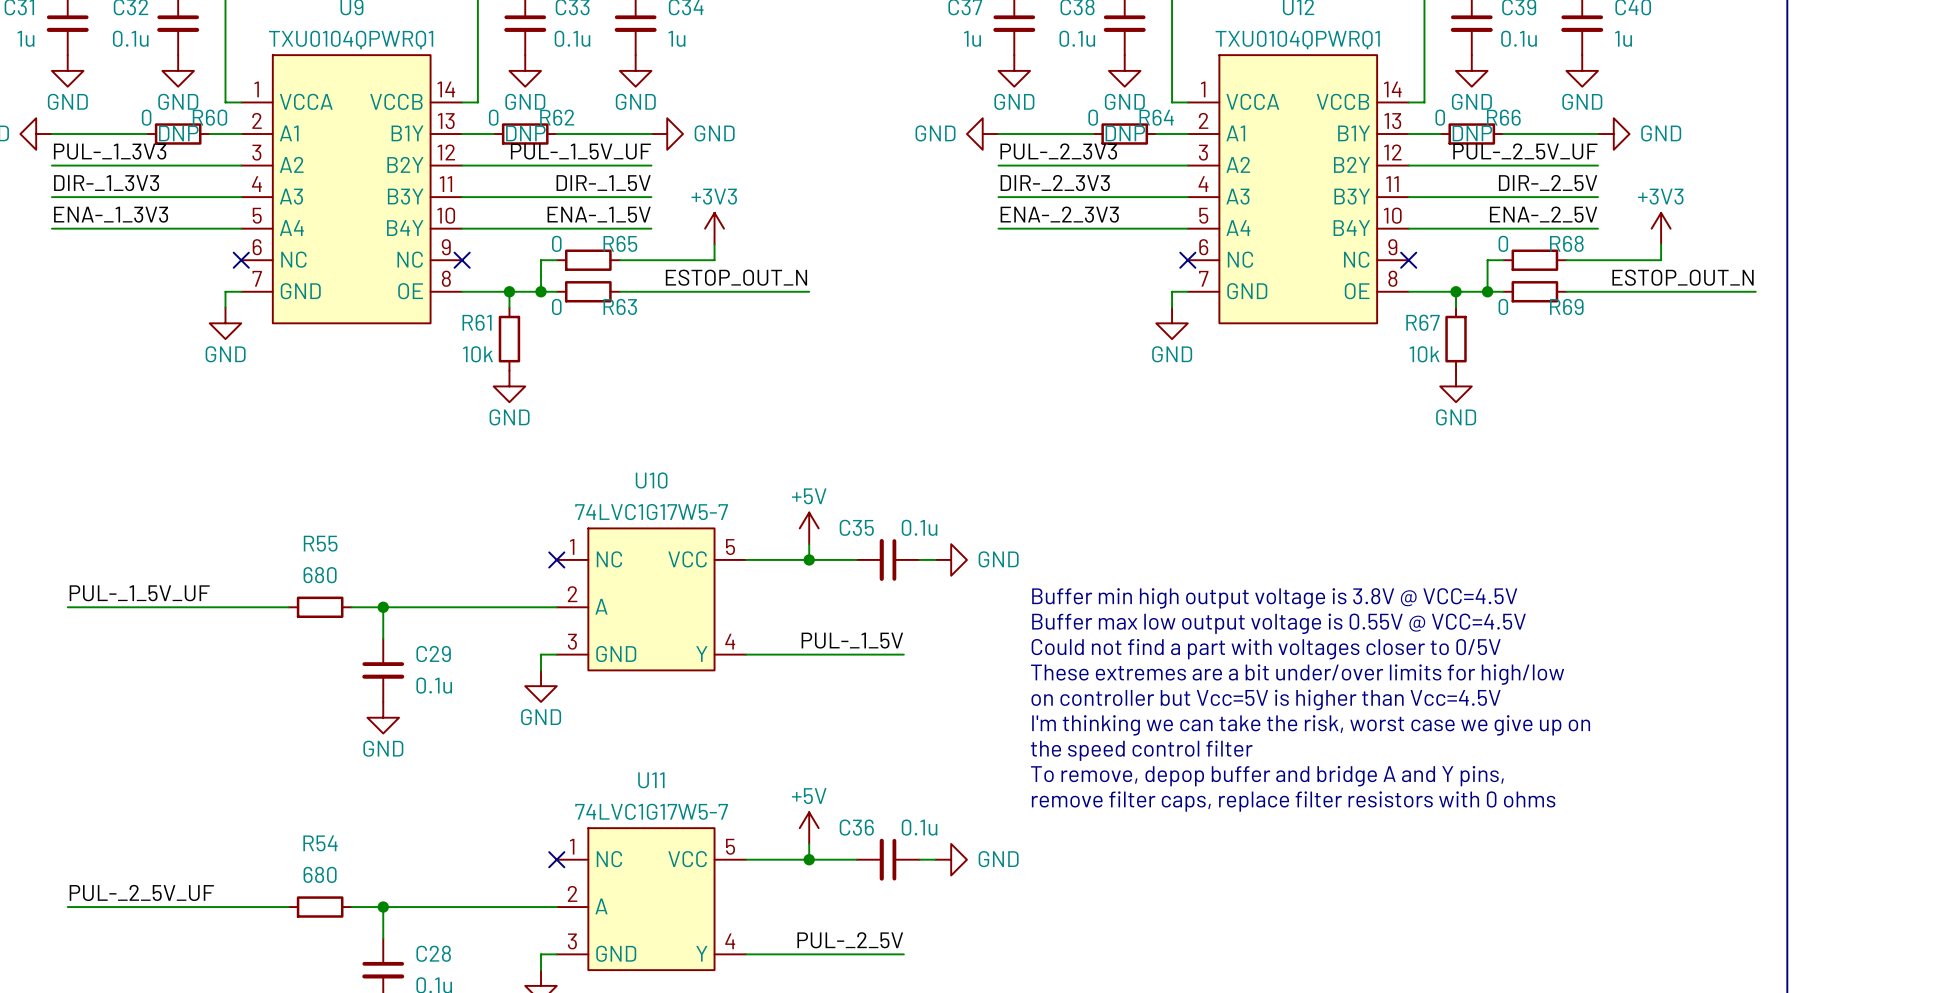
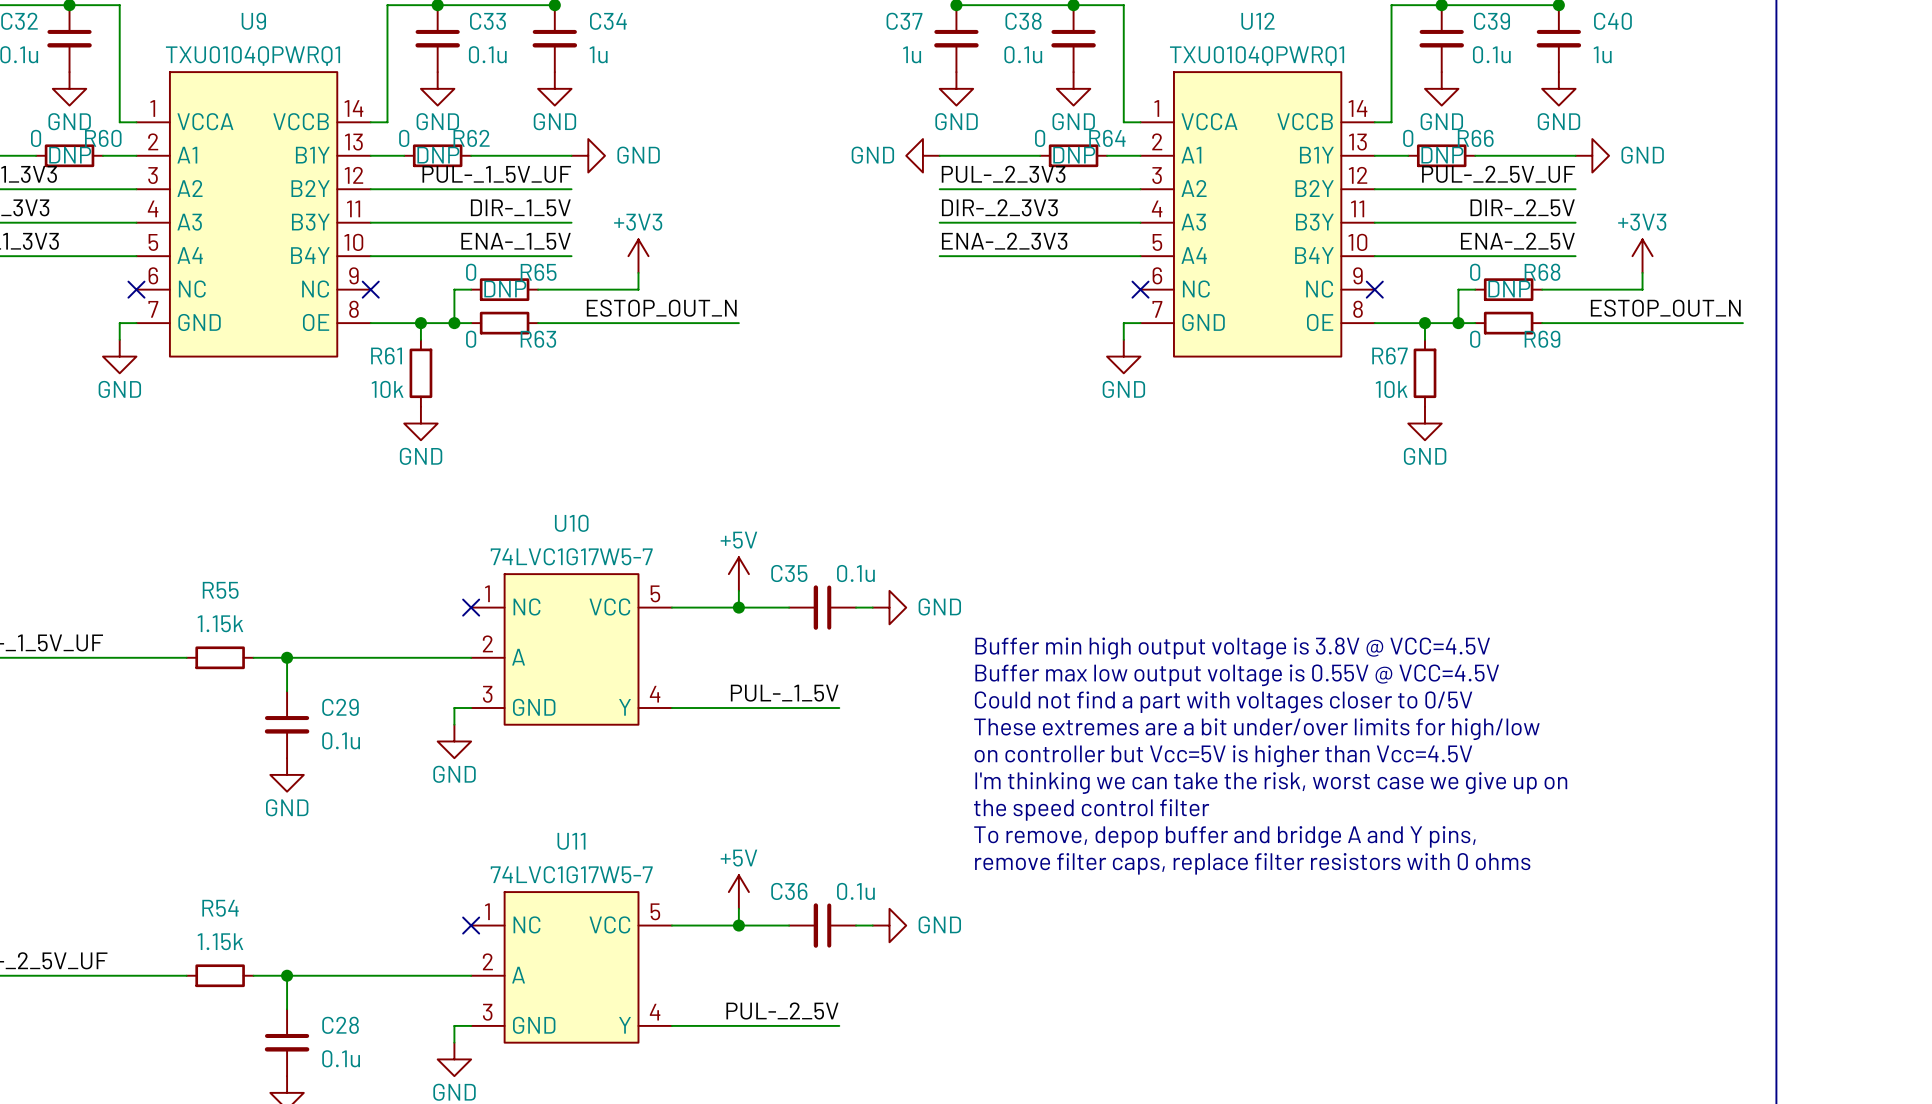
R65 text: none -> DNP (505, 289)
R68 text: none -> DNP (1509, 289)
R55 value: 680 (320, 575) -> 1.15k (220, 623)
R54 value: 680 (320, 874) -> 1.15k (220, 941)

